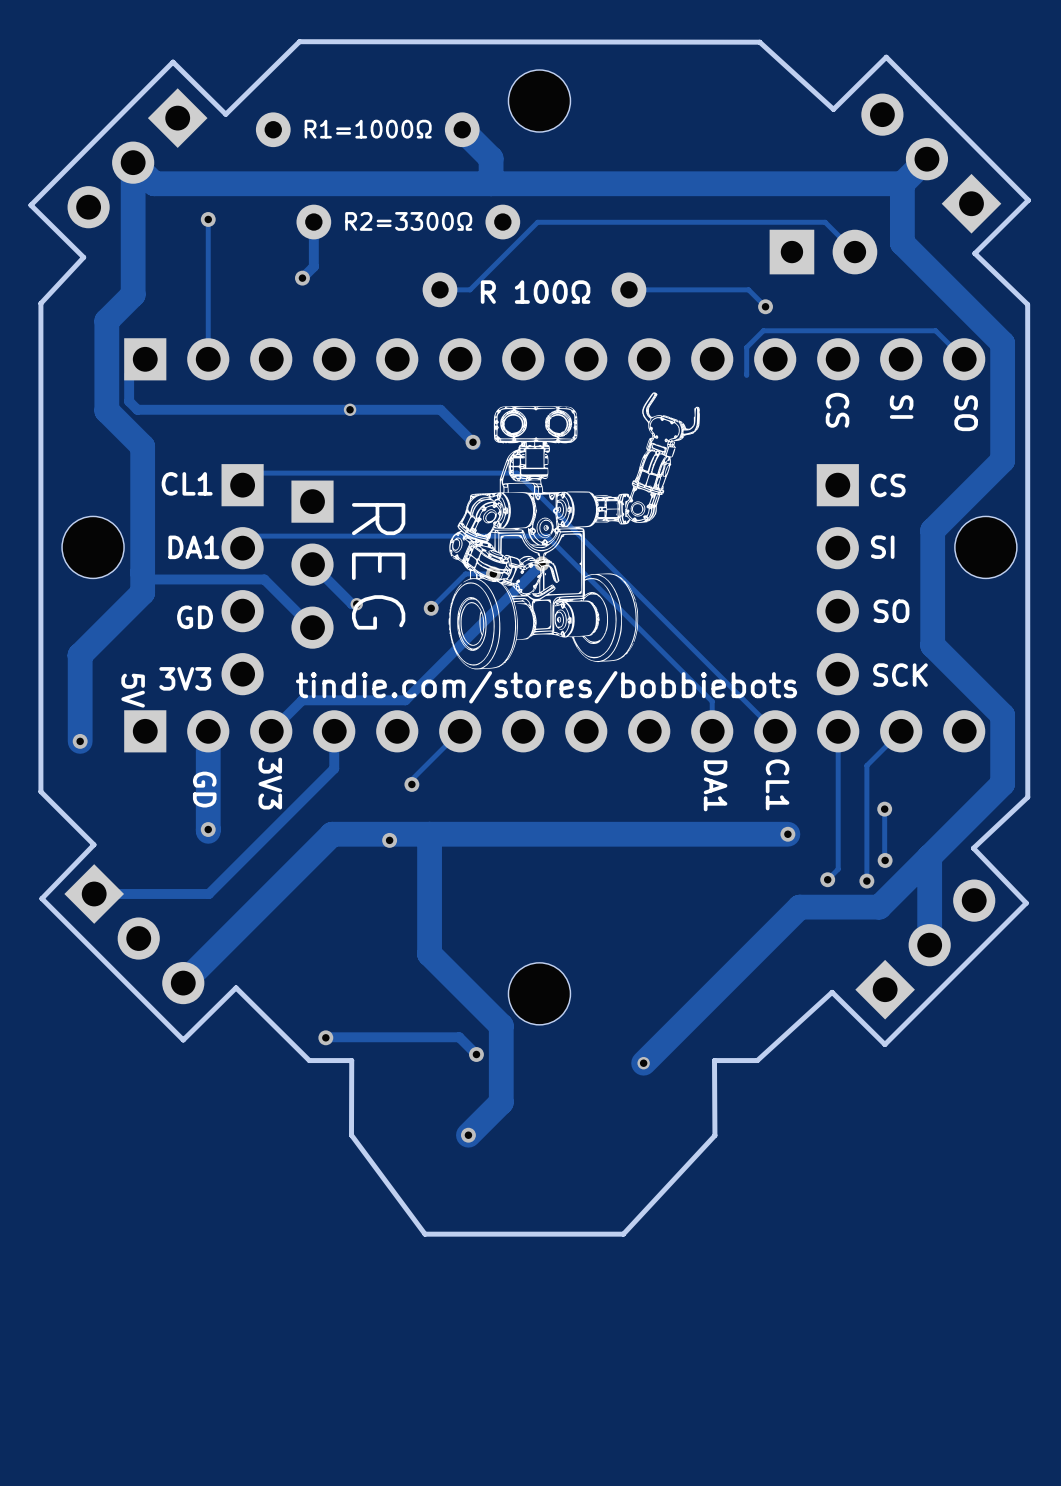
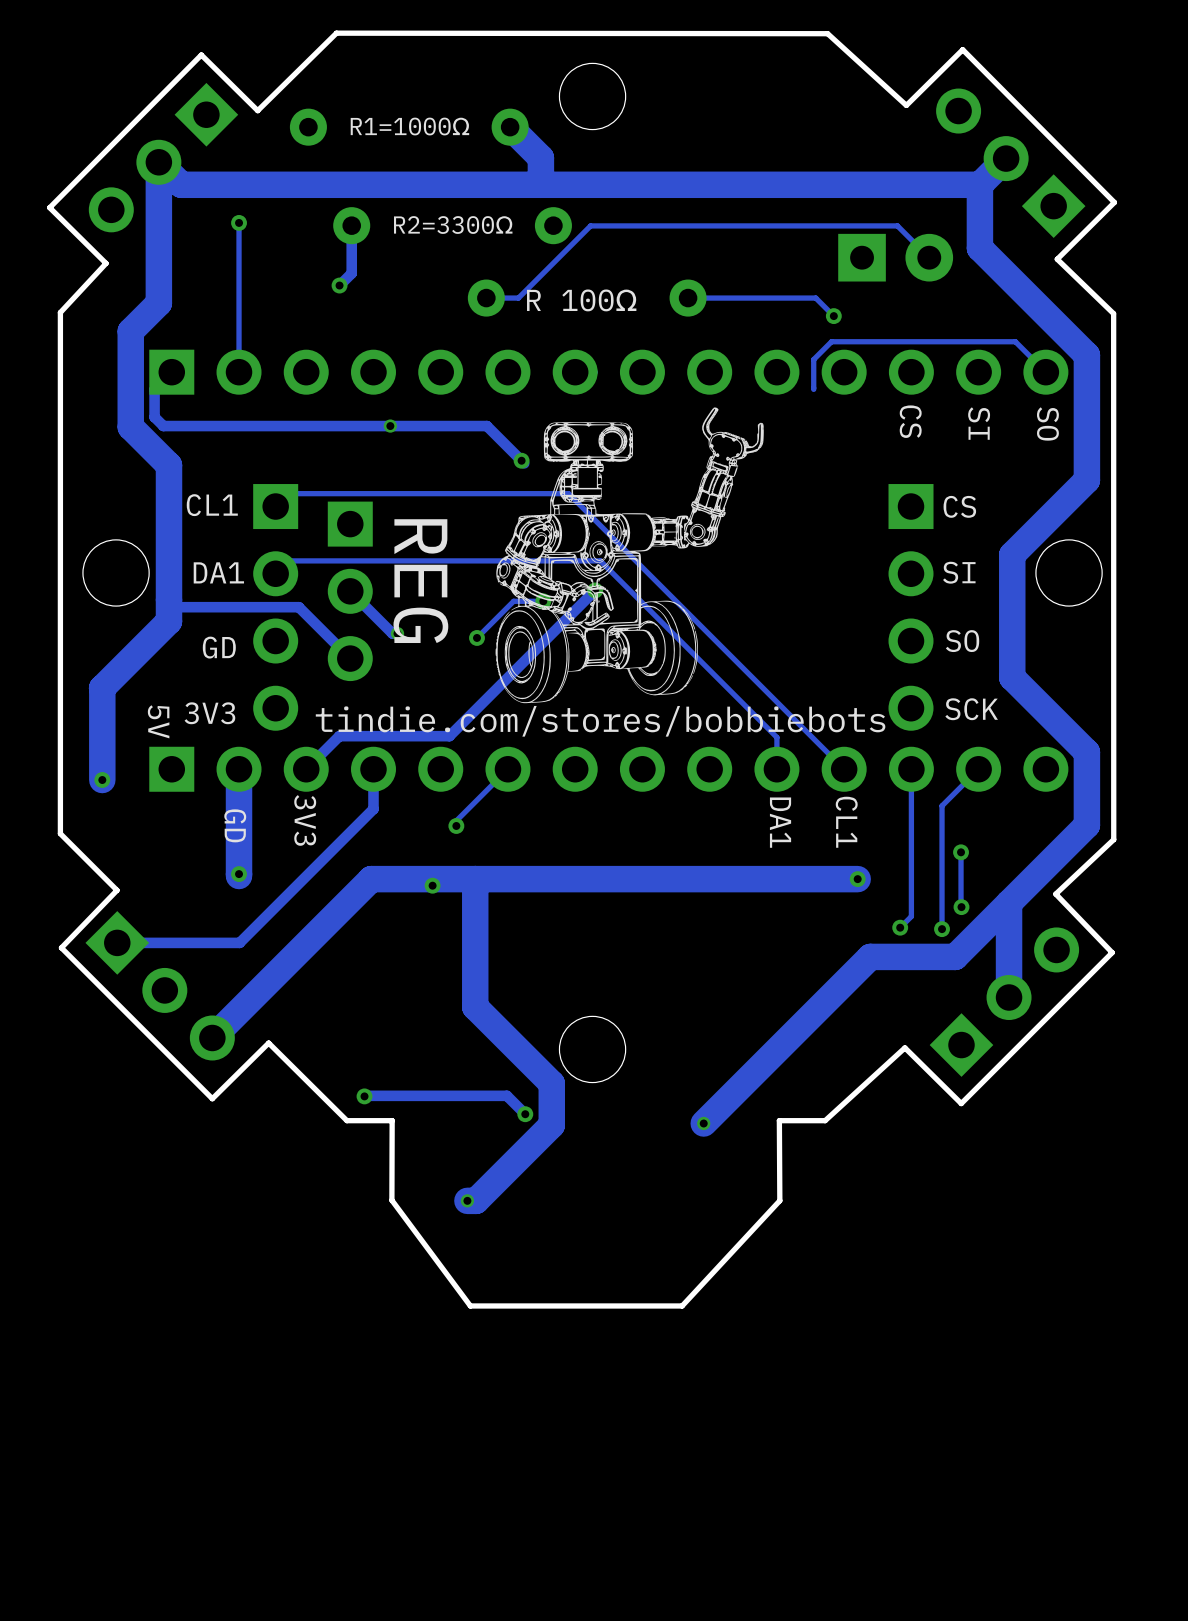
track: (501, 1064) (501, 1102) (468, 1135) -> (551, 1125) (476, 1200) (467, 1200)
via: none -> (467, 1200)
via: (468, 1135) -> none

